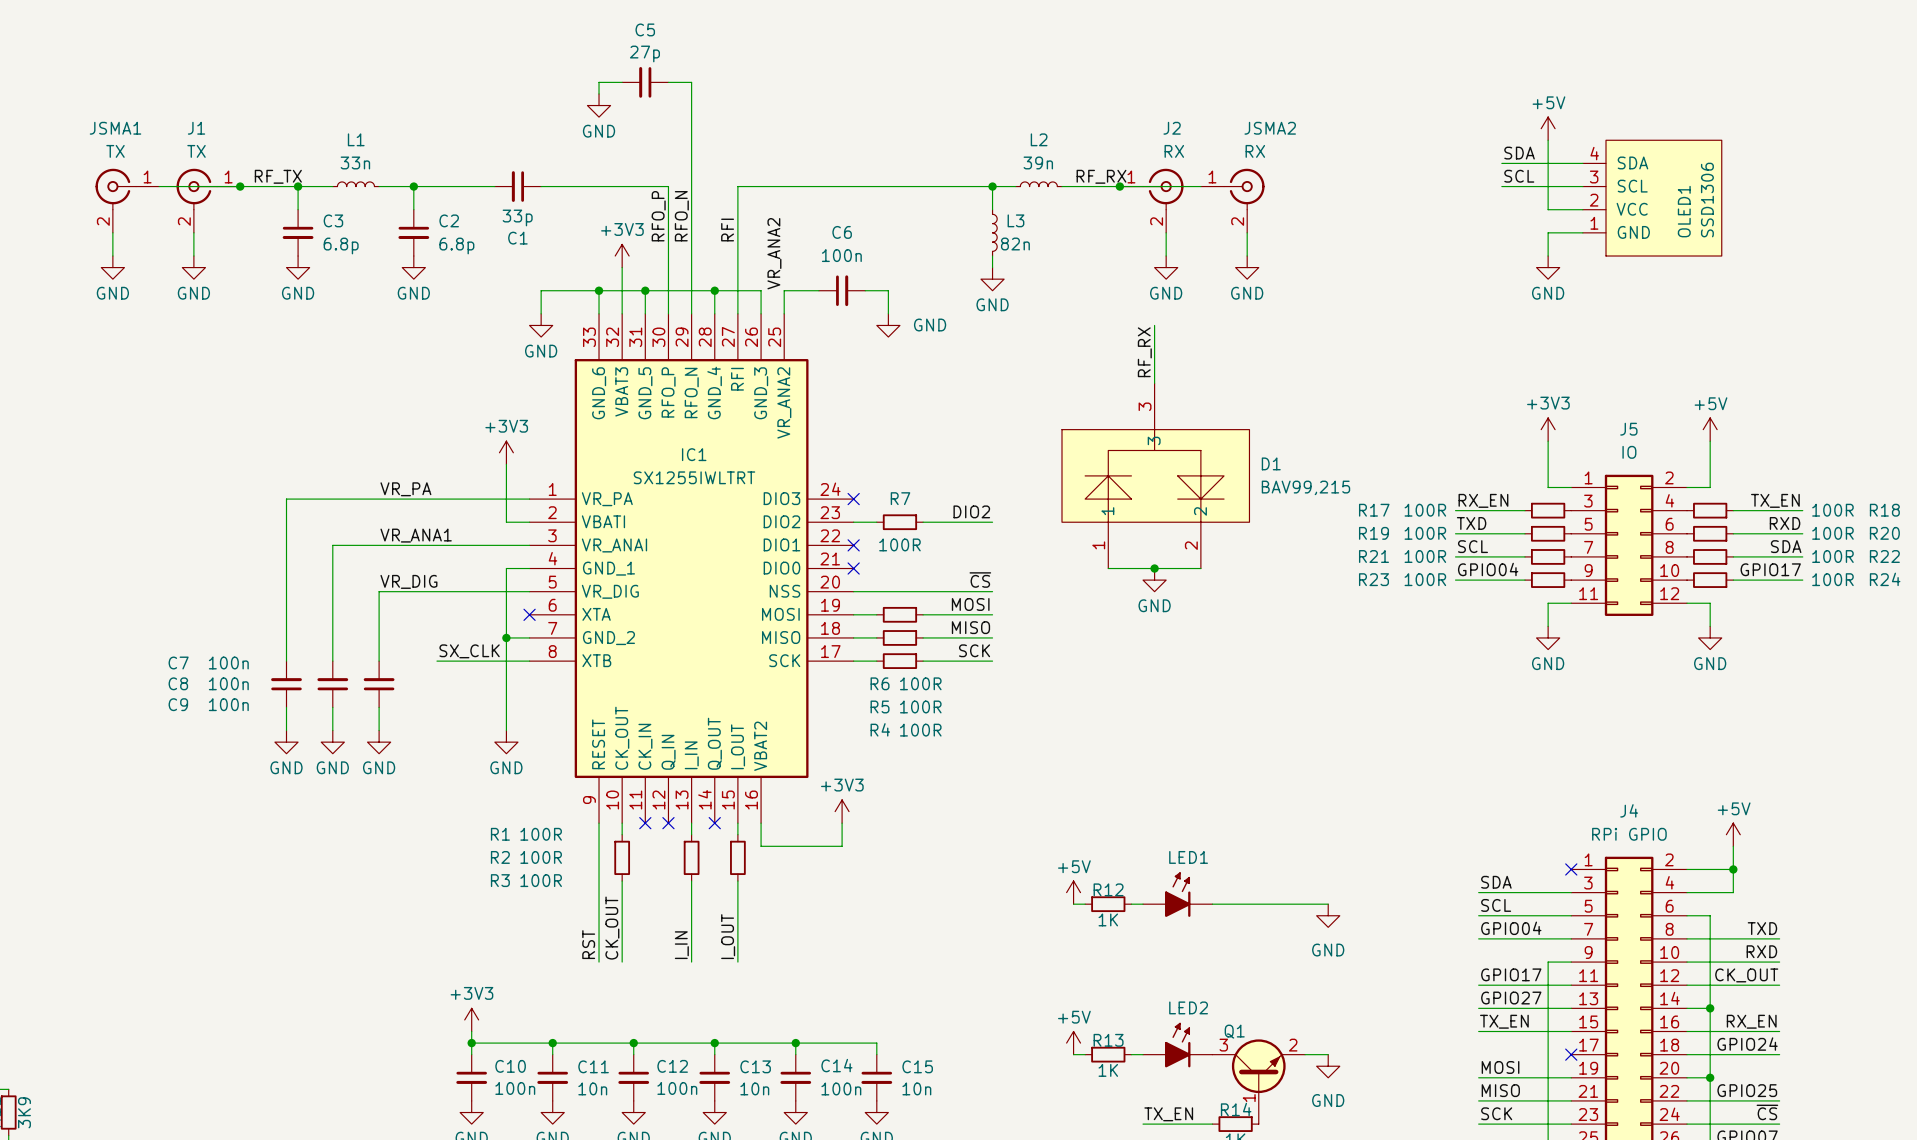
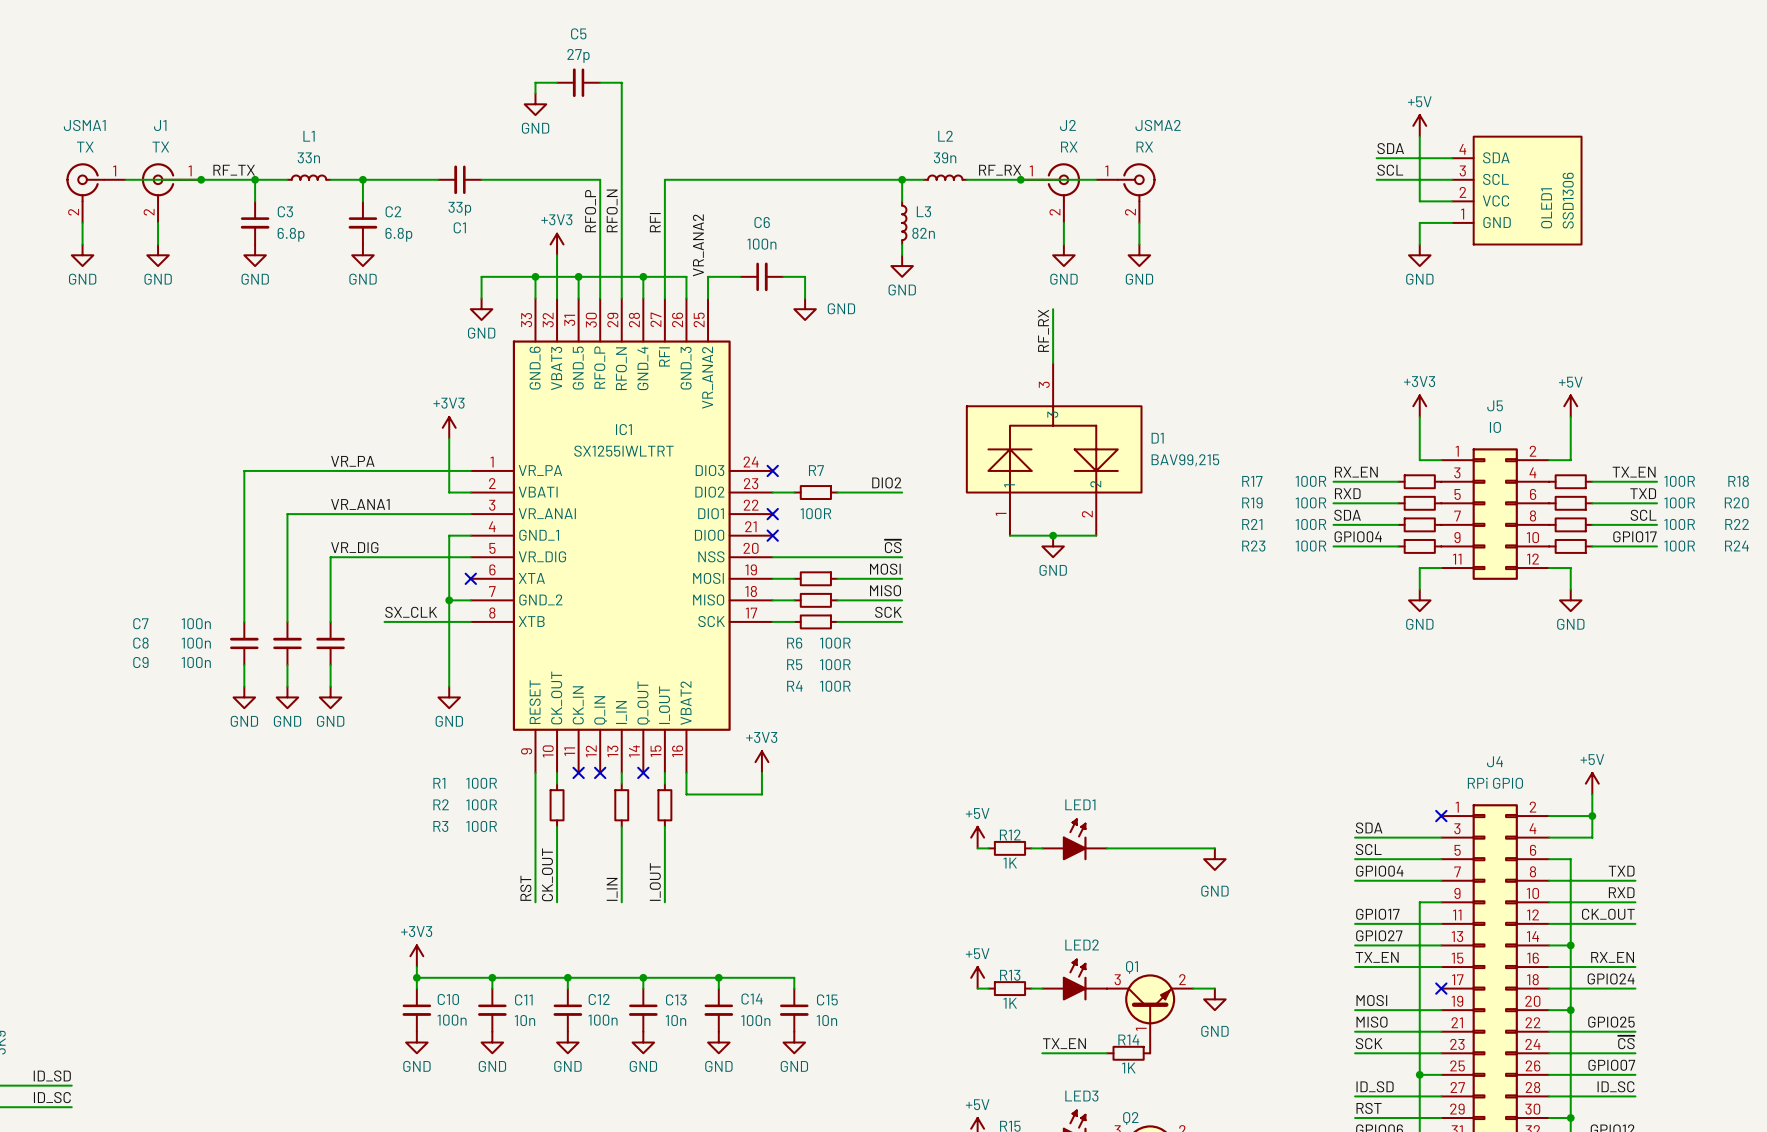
label: TXD (1471, 523) -> RXD (1347, 493)
label: RXD (1785, 523) -> TXD (1643, 493)
label: SCL (1472, 546) -> SDA (1347, 515)
label: SDA (1786, 546) -> SCL (1643, 515)

